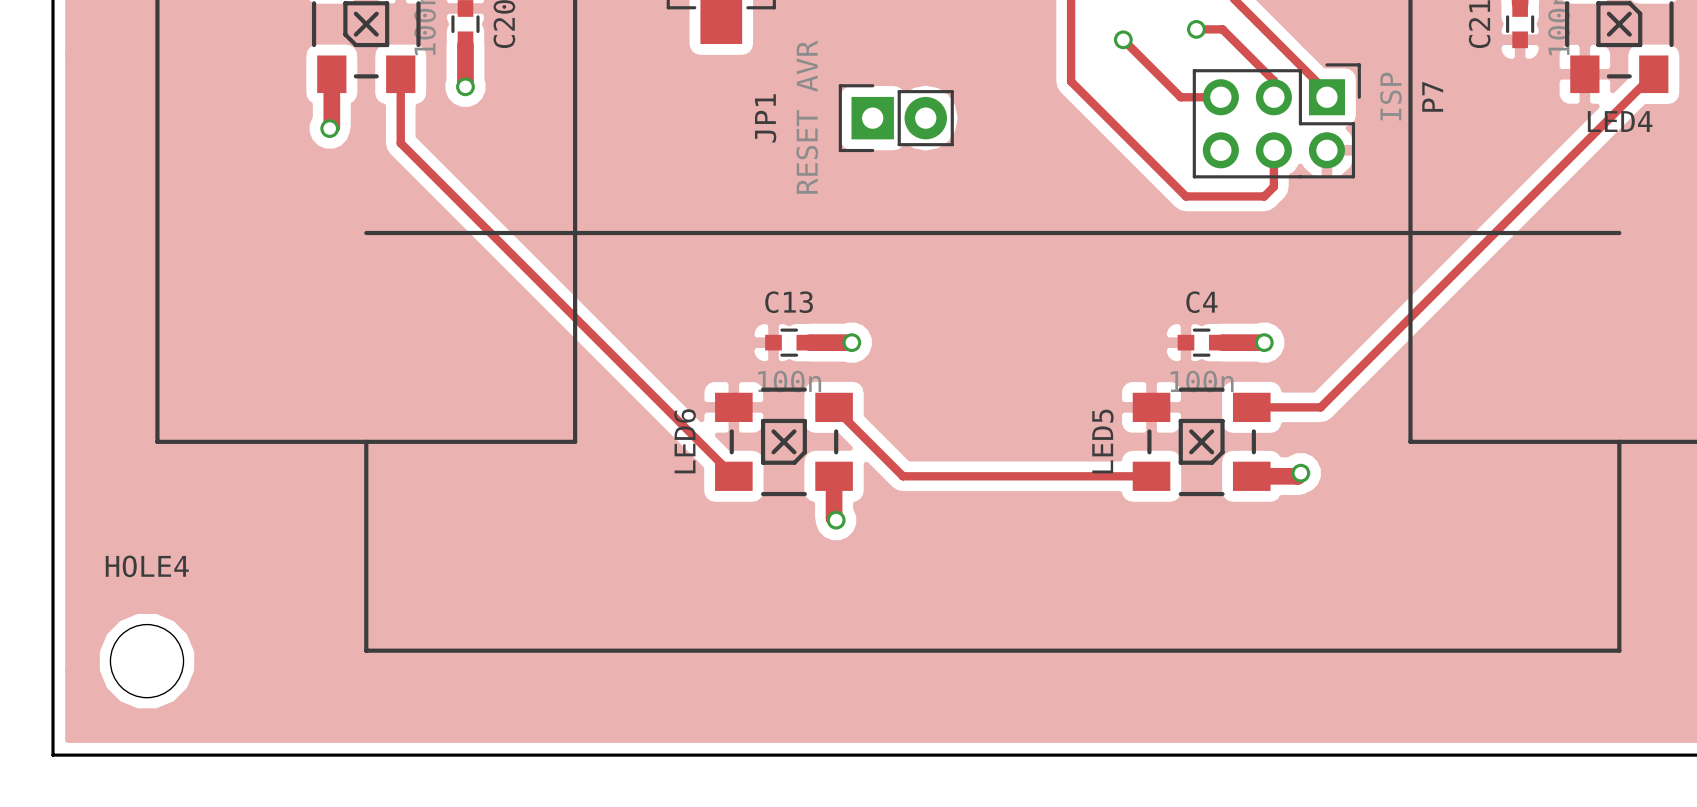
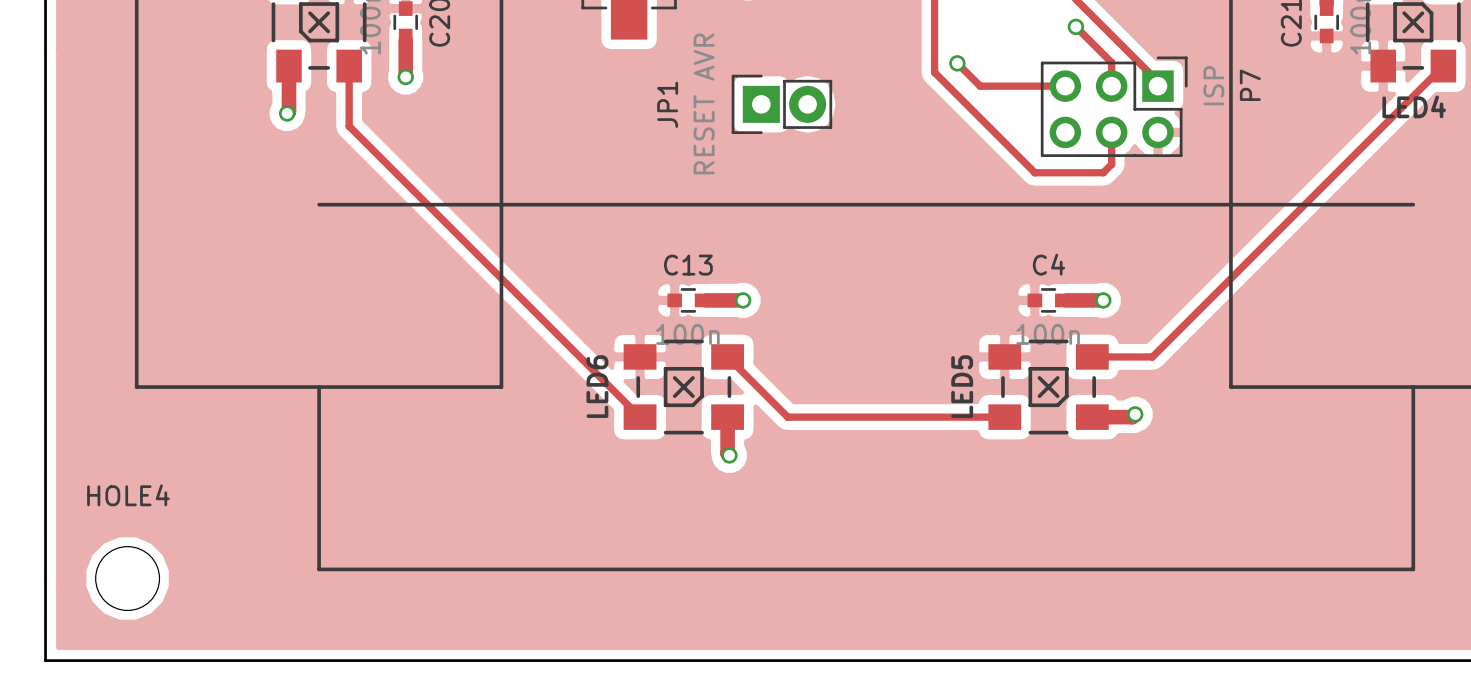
track: (1196, 29) (1222, 29) (1273, 80) -> (1075, 26) (1111, 62) (1111, 71)
via position: (1196, 29) -> (1075, 26)
track: (1123, 39) (1180, 97) -> (957, 63) (980, 86) (1030, 86)
via position: (1123, 39) -> (957, 63)

